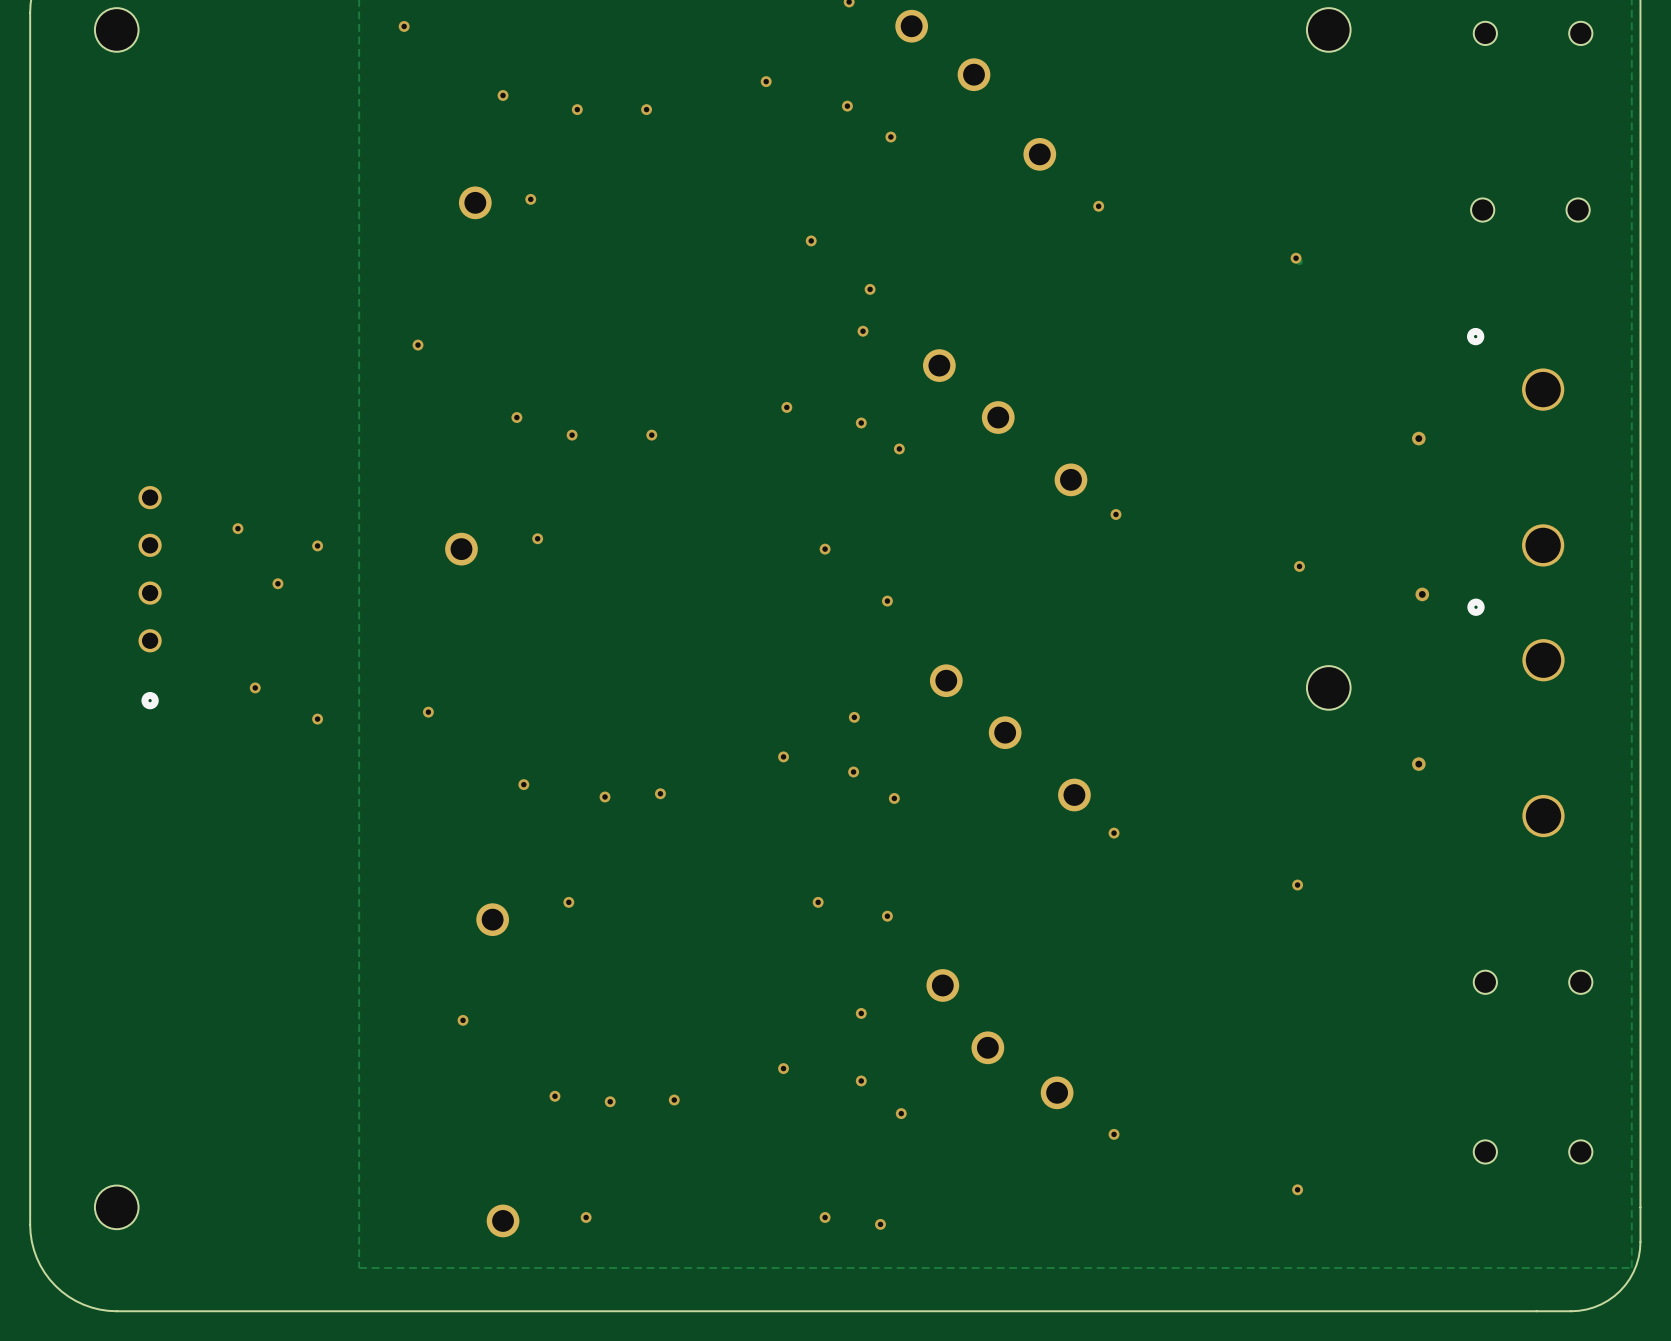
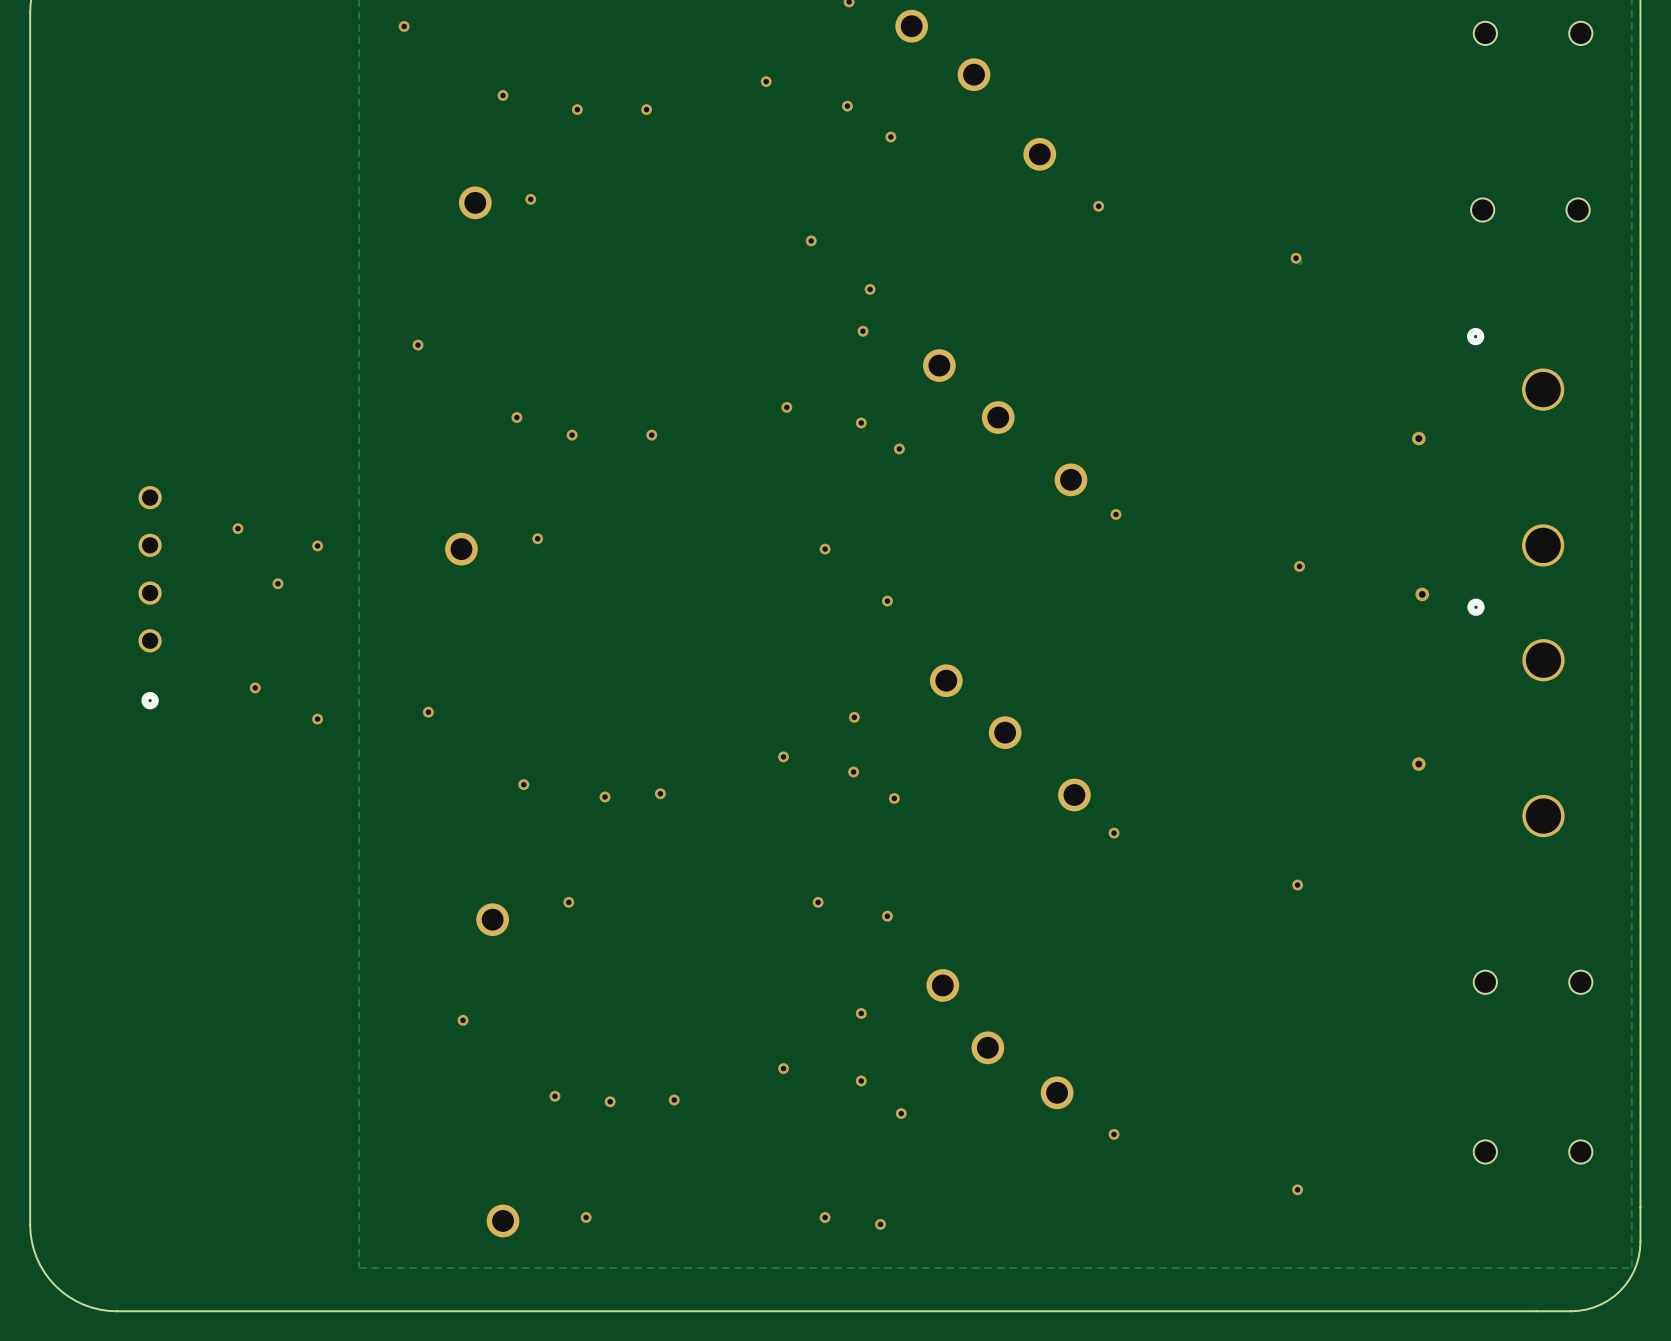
part: (116, 29) -> none
part: (1328, 29) -> none
part: (1328, 687) -> none
part: (116, 1207) -> none

